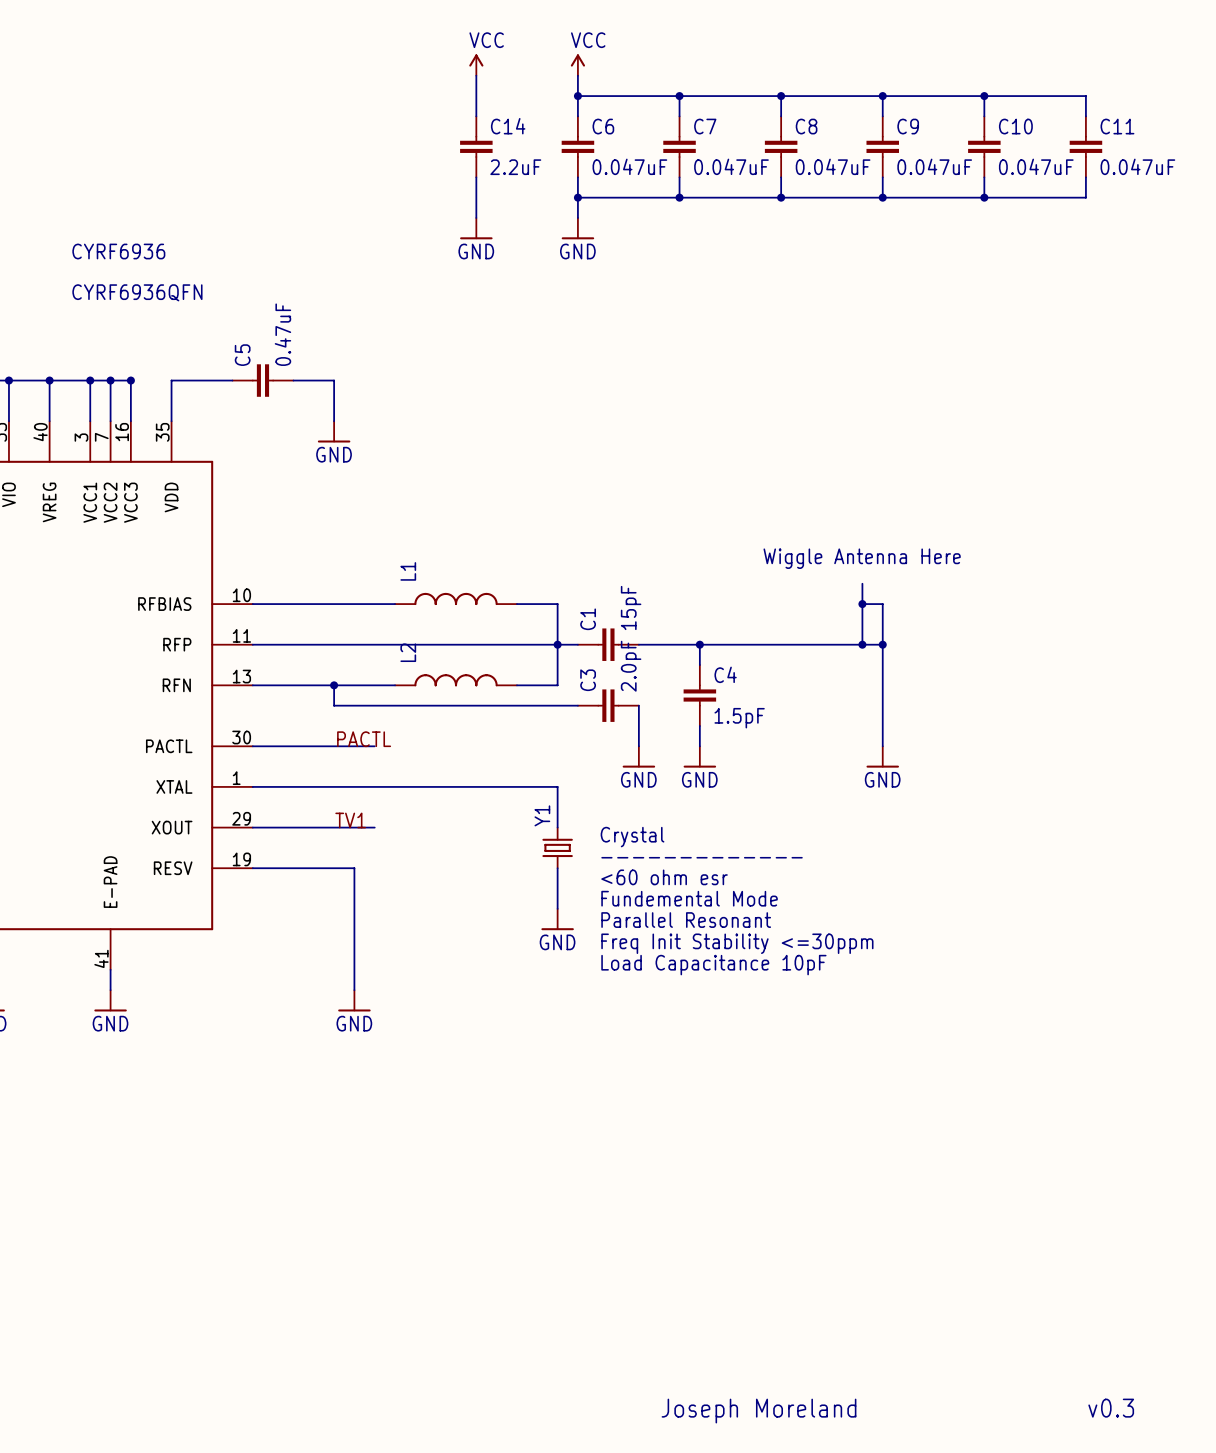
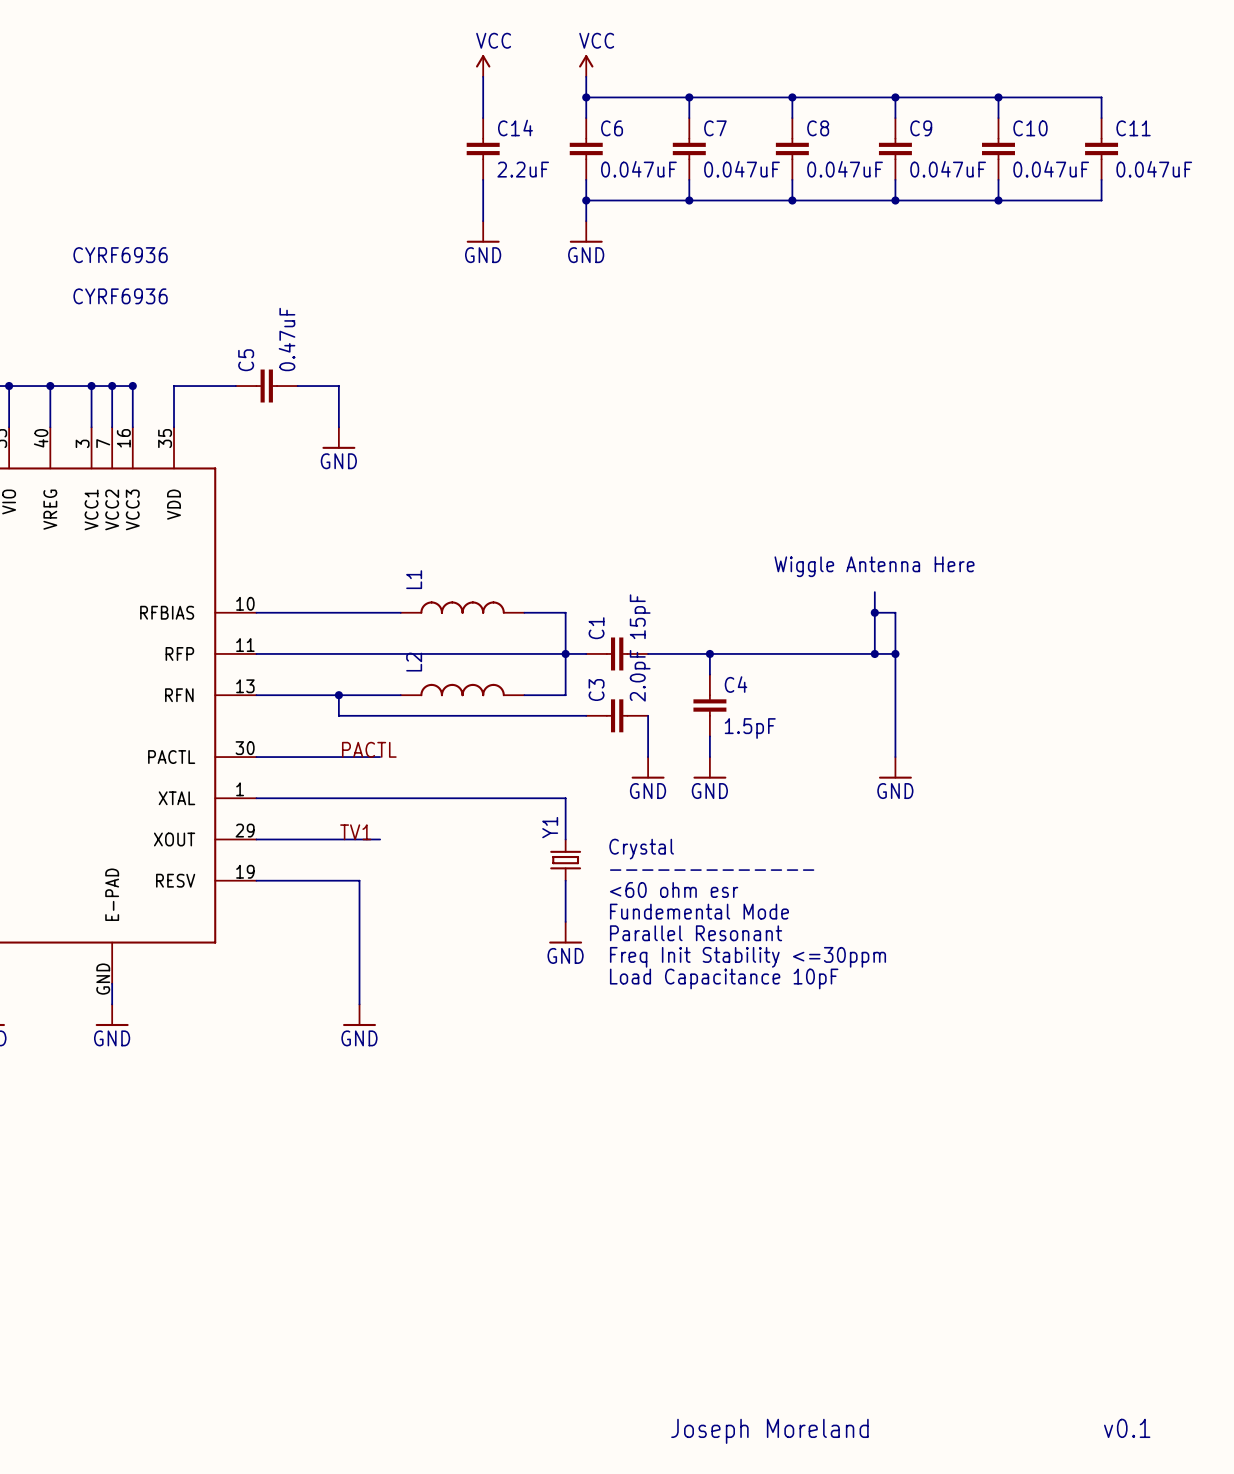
CYRF6936 value: CYRF6936QFN (137, 292) -> CYRF6936 (120, 296)
CYRF6936 pin number: 41 (101, 958) -> GND (103, 979)
text: v0.3 (1111, 1408) -> v0.1 (1127, 1428)

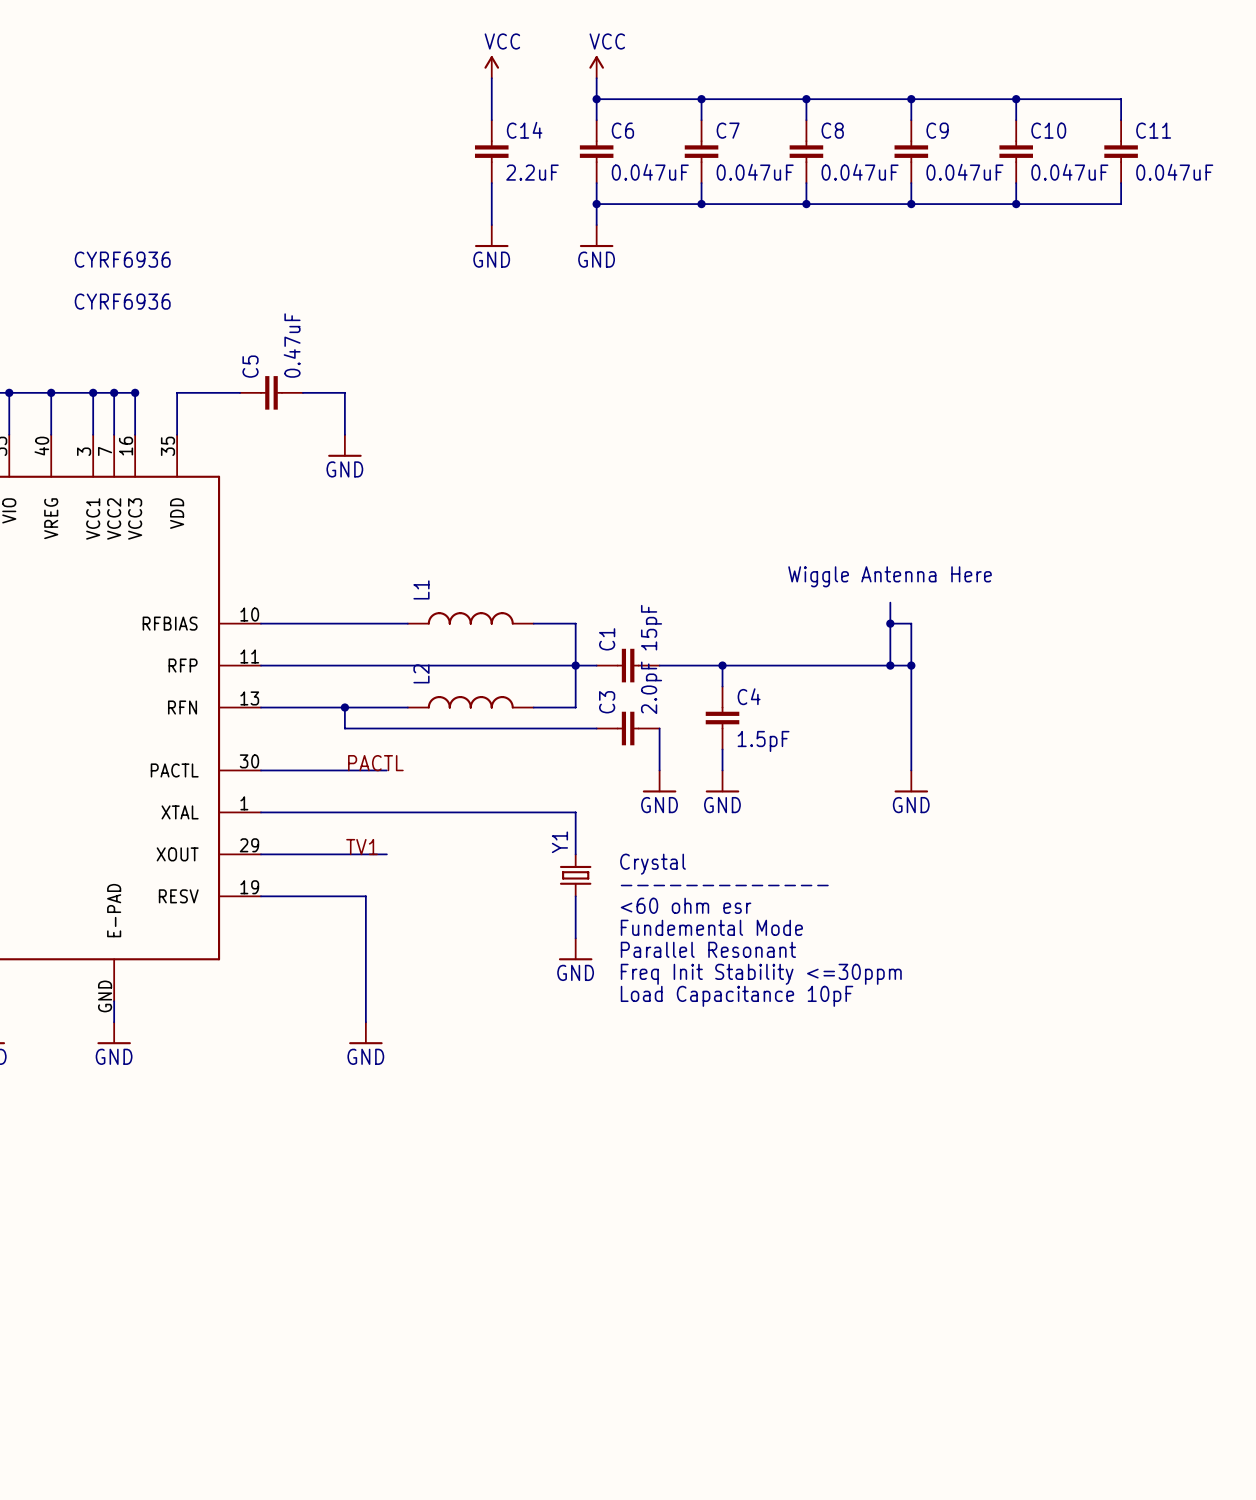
text: v0.1 (1127, 1428) -> none
text: Joseph Moreland (769, 1431) -> none

